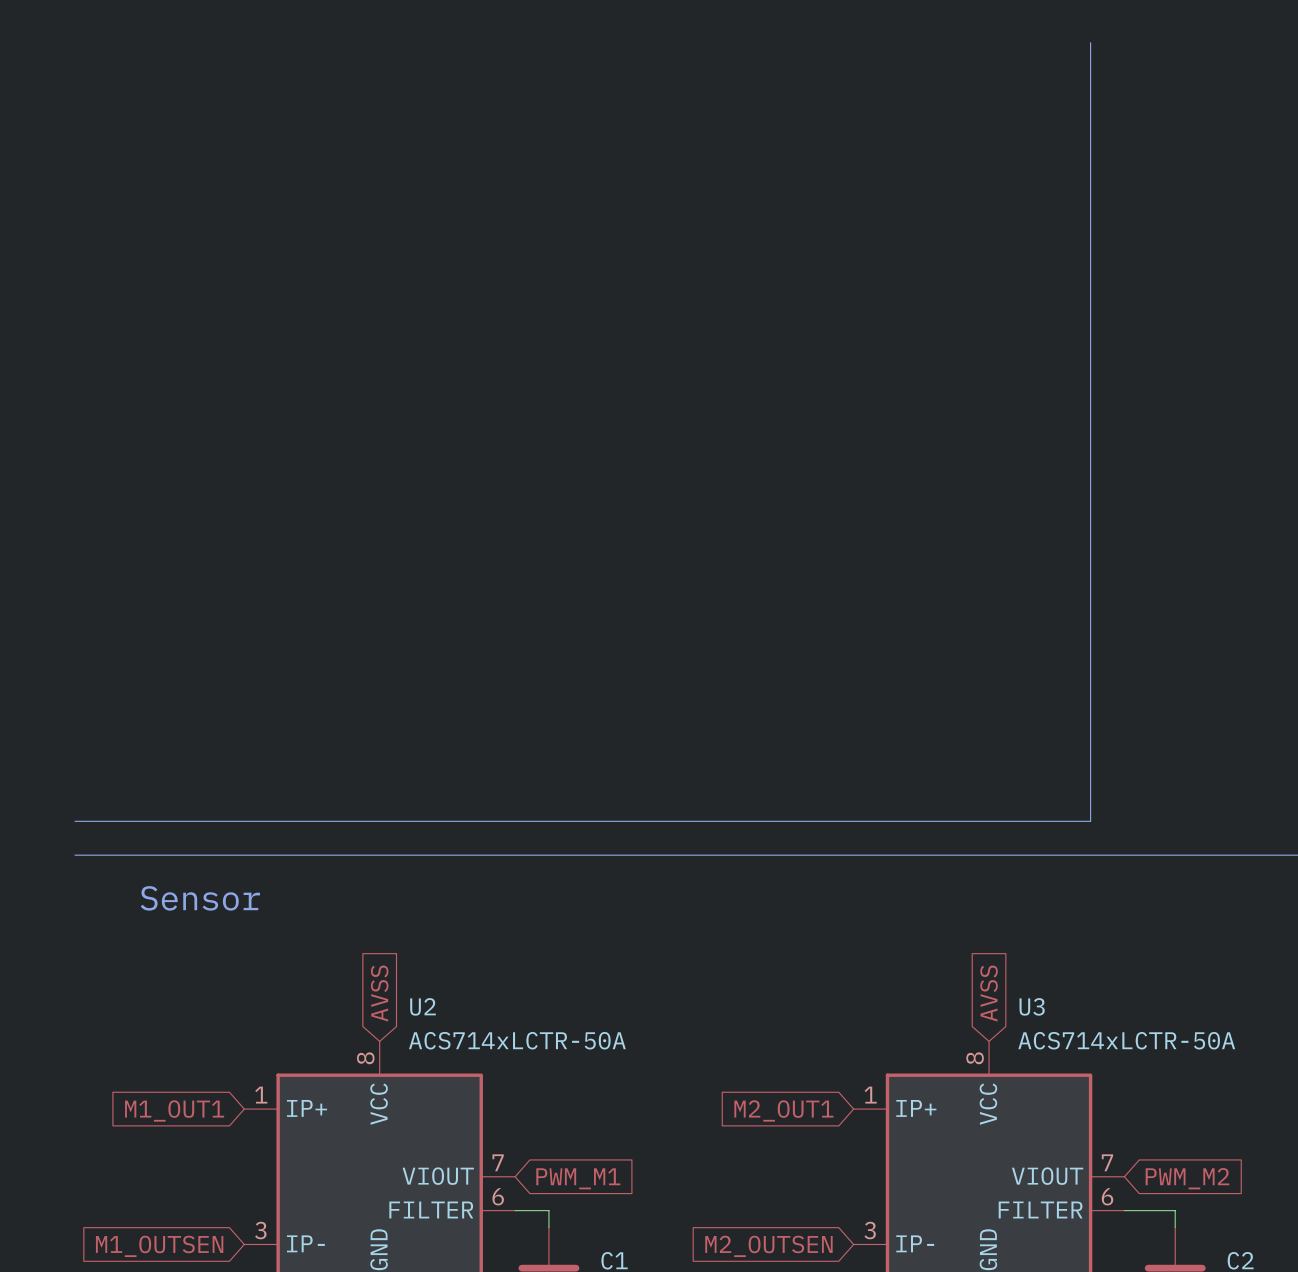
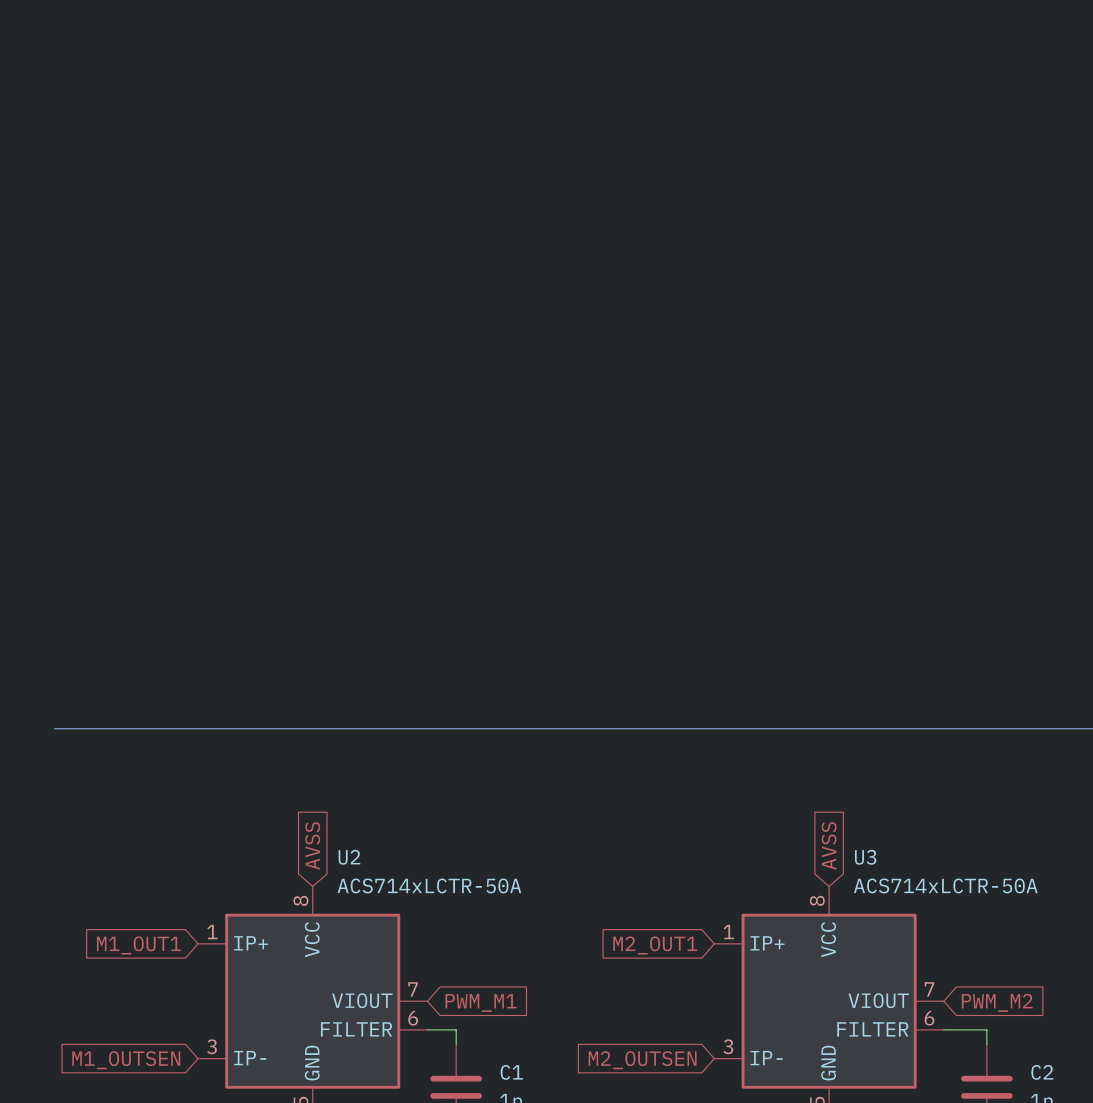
line: (1090, 42) (1090, 821) (75, 821) -> none
text: Sensor (200, 898) -> none

